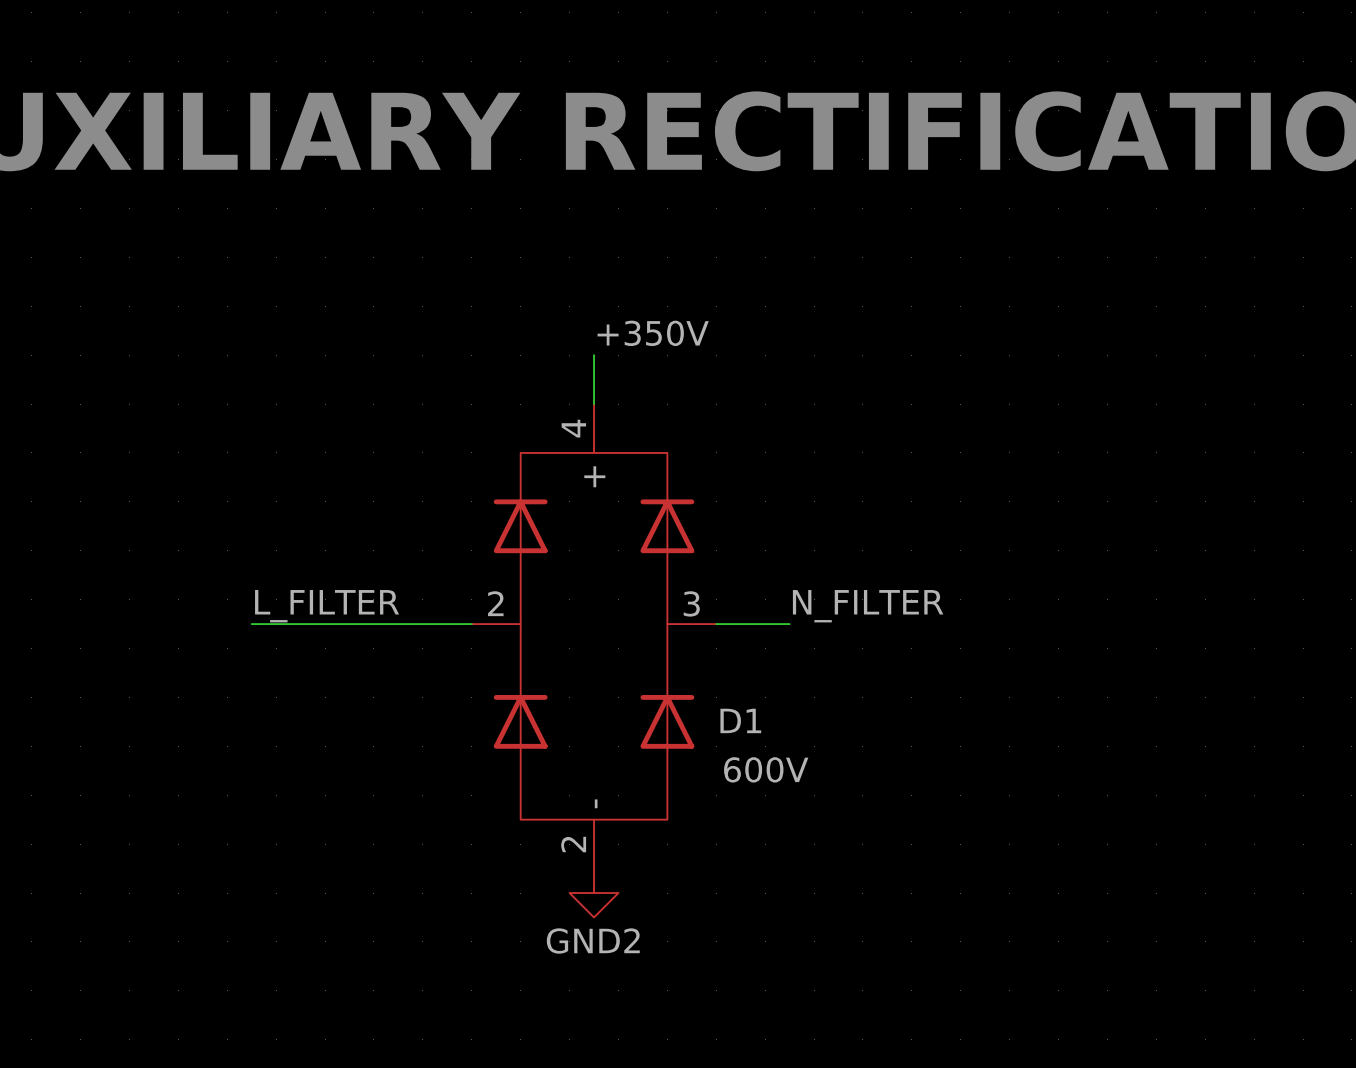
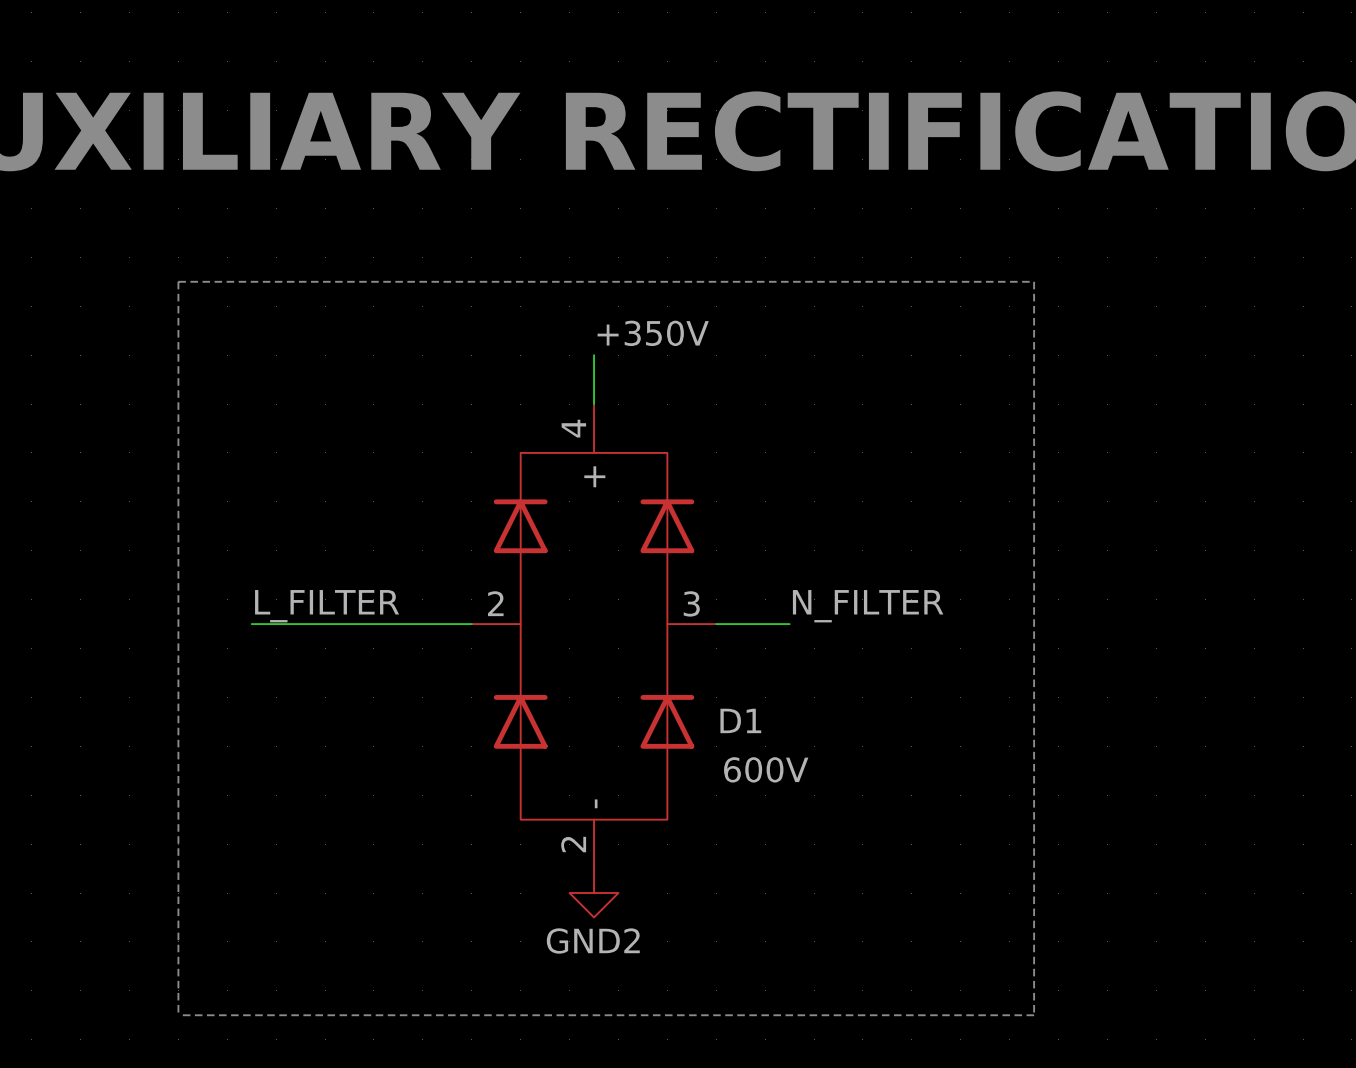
line: none -> (178, 281) (1034, 281) (1034, 1015) (178, 1015) (178, 281)

